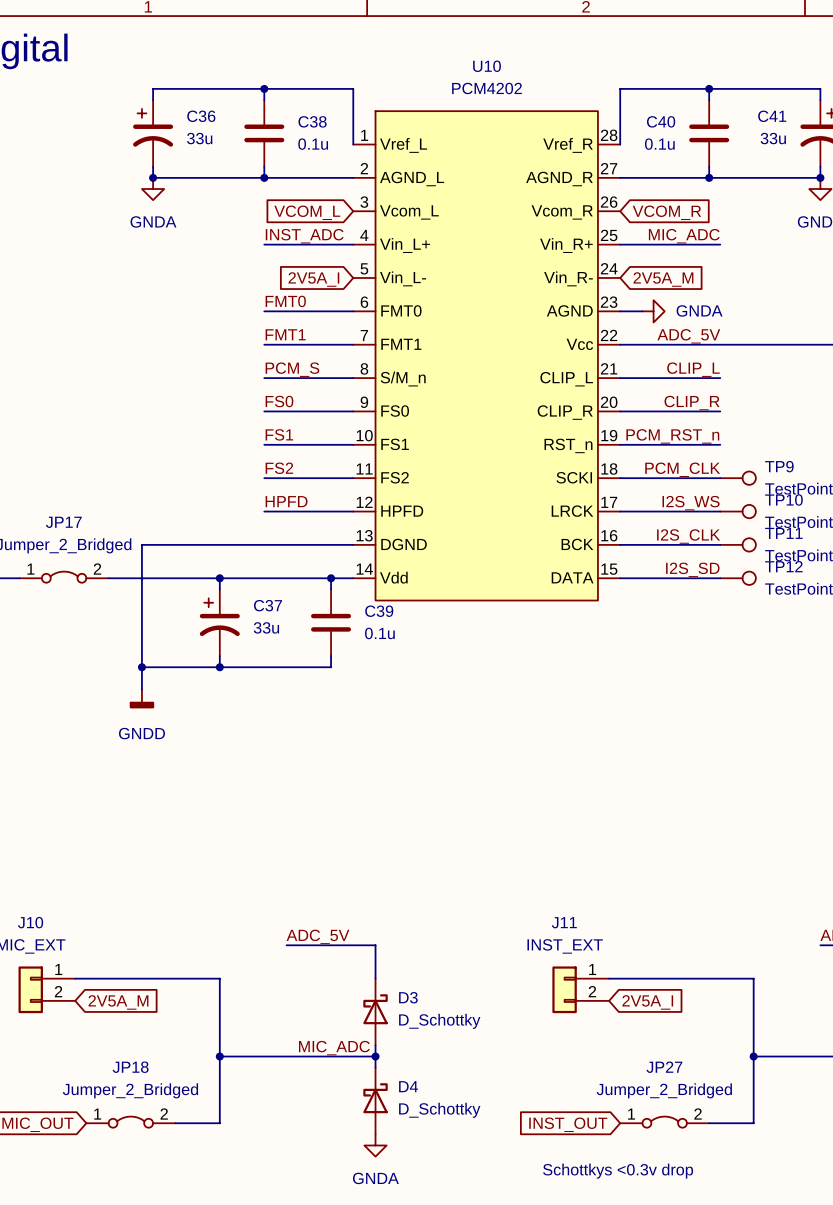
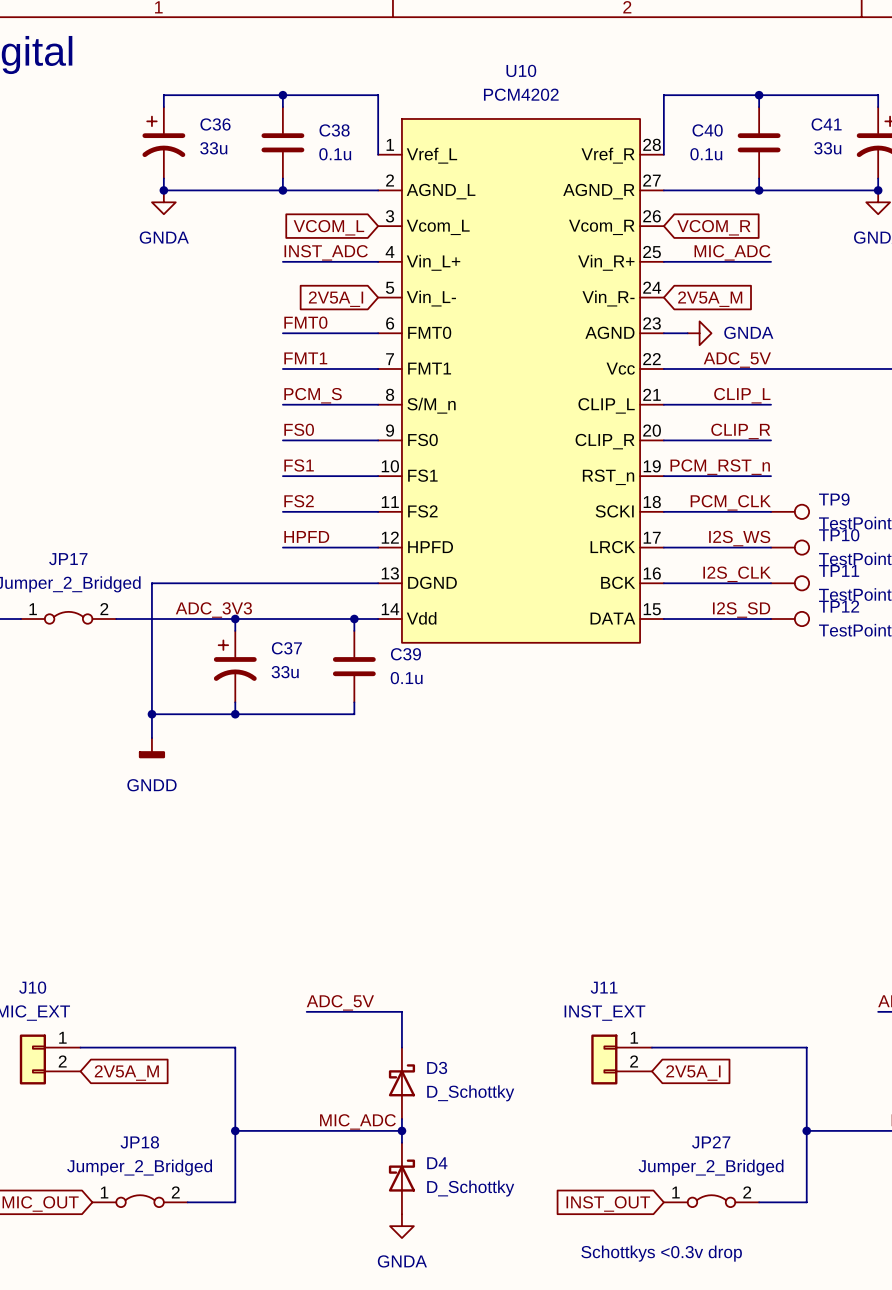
label: none -> ADC_3V3 (213, 610)

